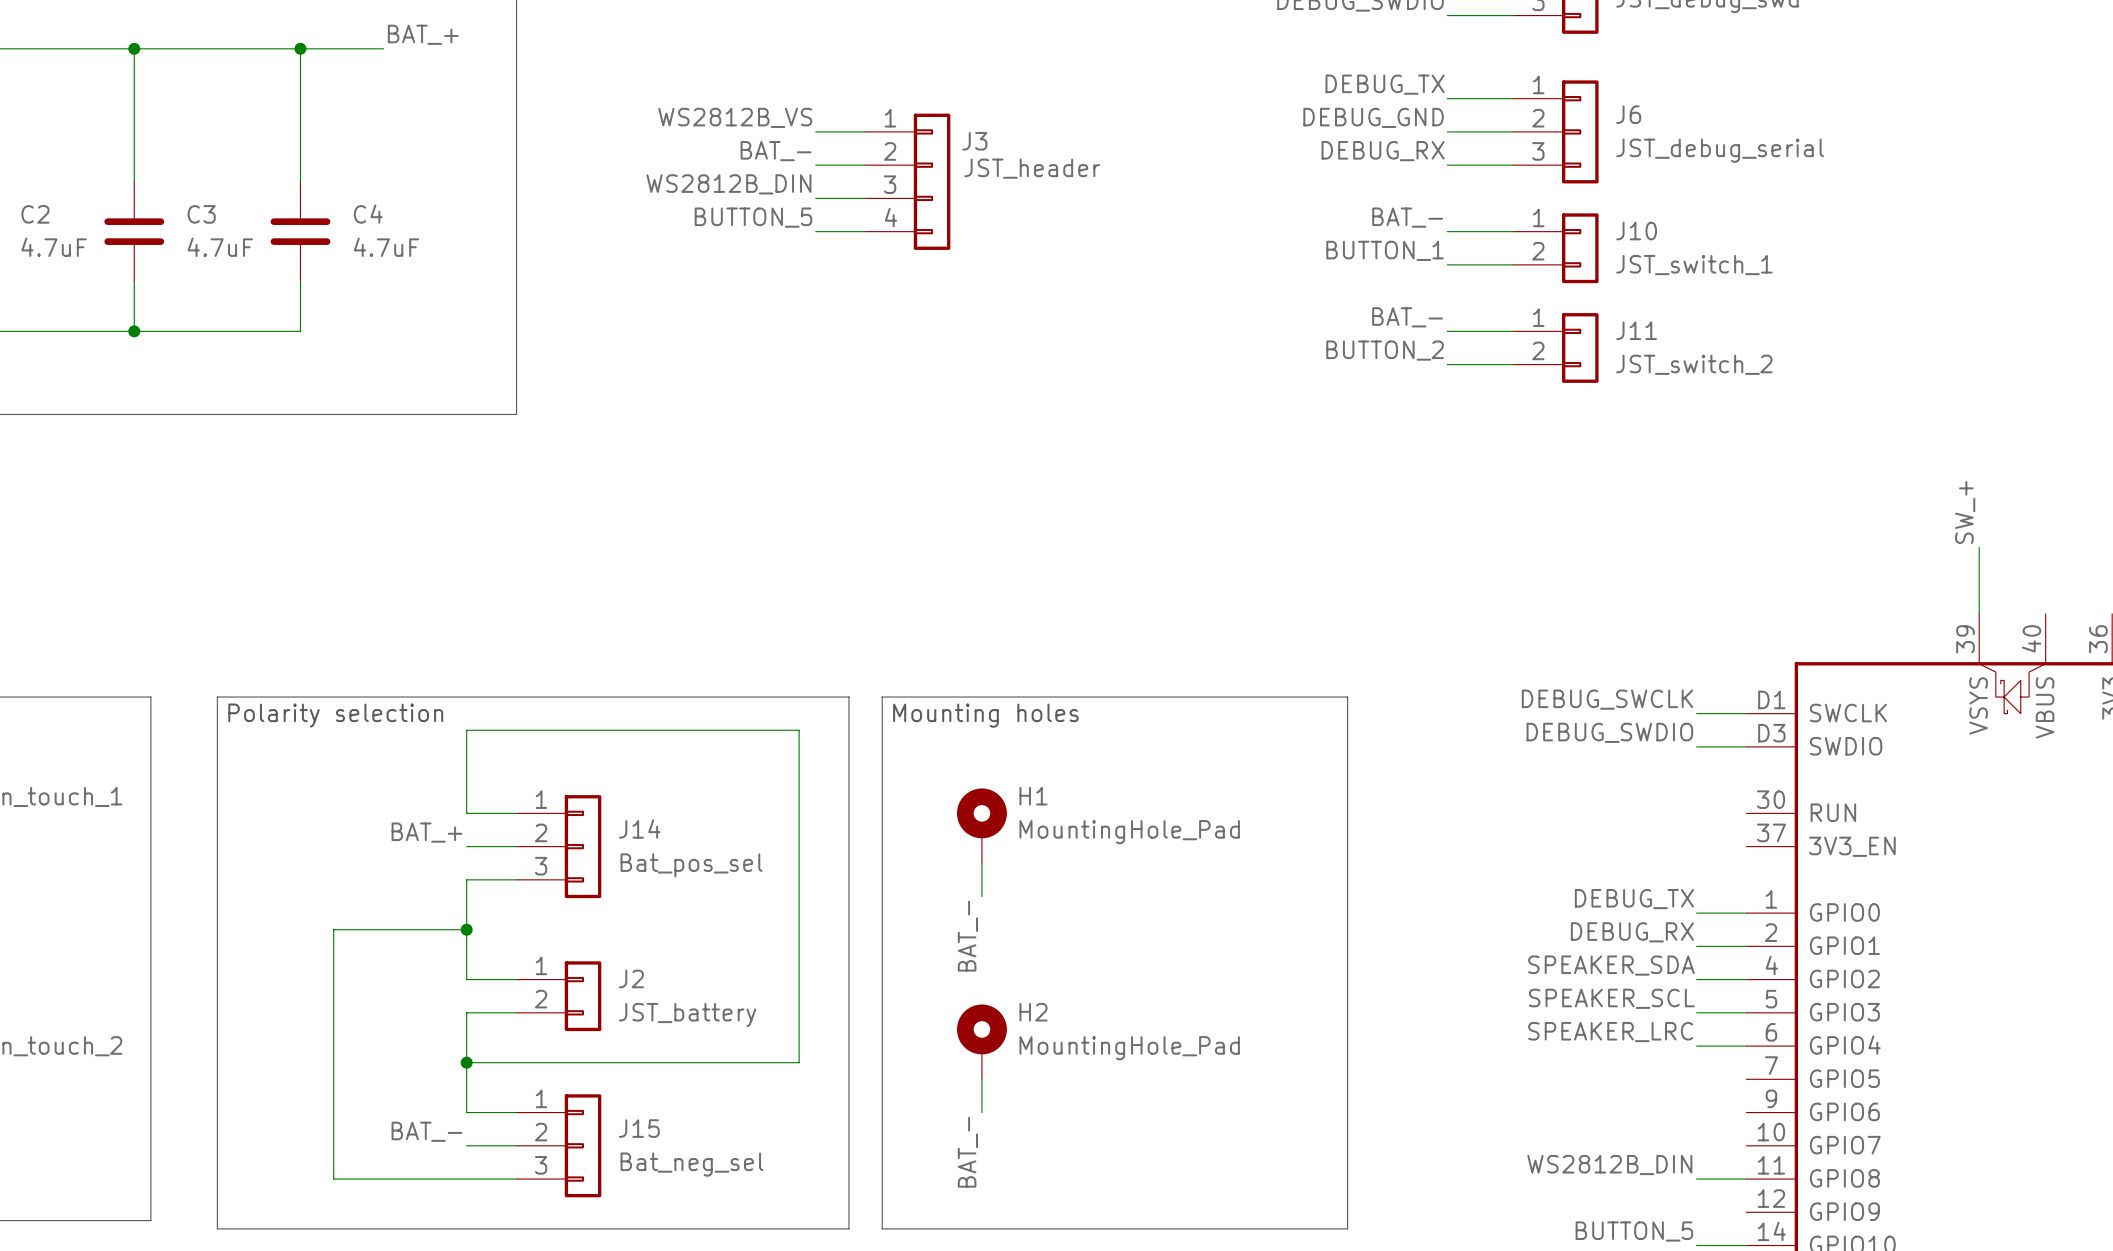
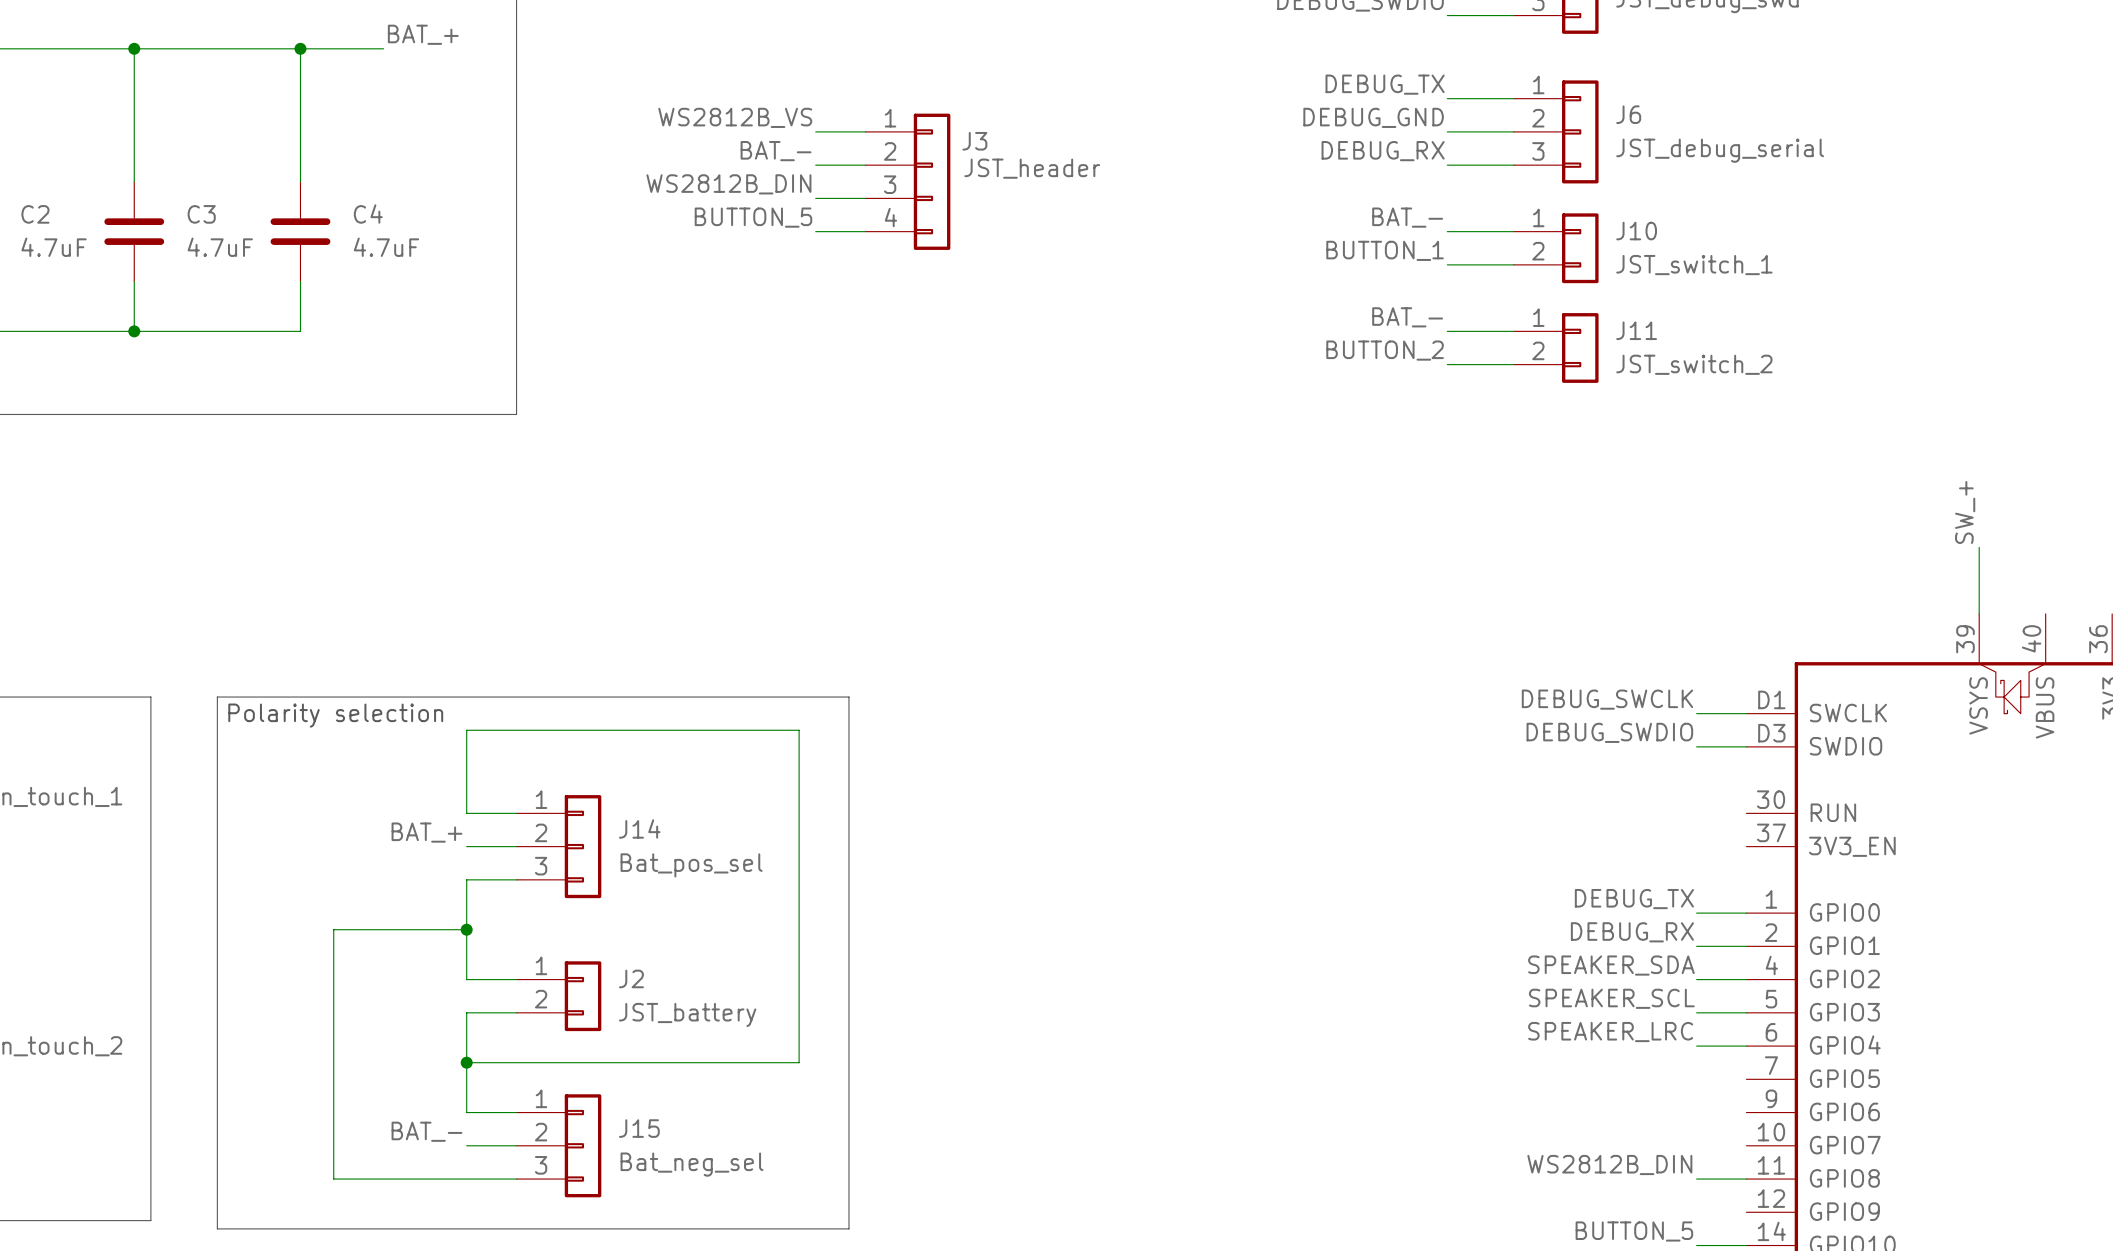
line: (882, 697) (1347, 697) (1347, 1228) (882, 1228) (882, 697) -> none
text: Mounting holes (985, 715) -> none
H1: MountingHole_Pad (981, 825) -> none
wire: (981, 863) (981, 896) -> none
label: BAT_- (967, 936) -> none
H2: MountingHole_Pad (981, 1041) -> none
wire: (981, 1079) (981, 1112) -> none
label: BAT_- (967, 1152) -> none

